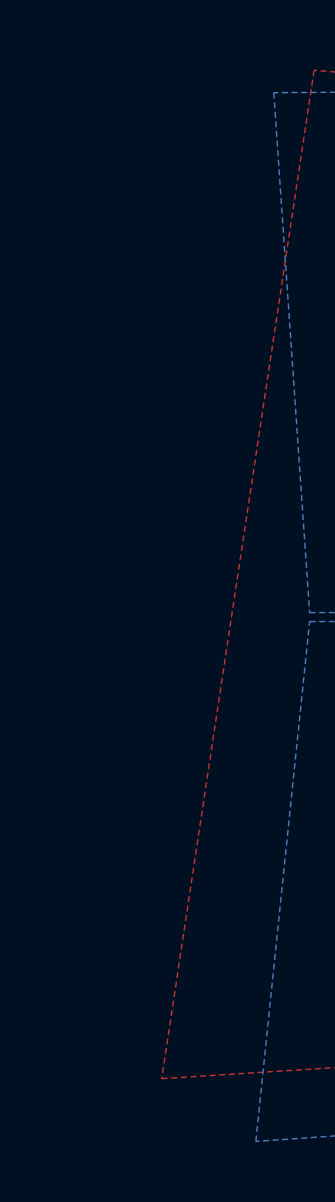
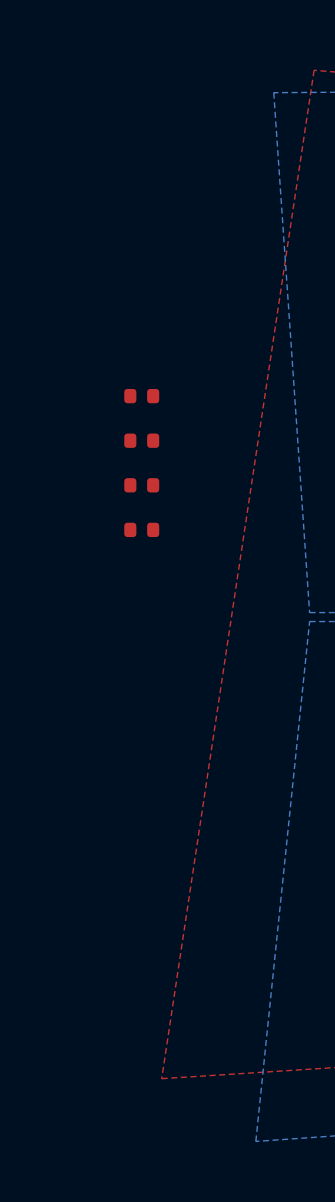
part: none -> (141, 396)
part: none -> (141, 440)
part: none -> (141, 485)
part: none -> (141, 529)

